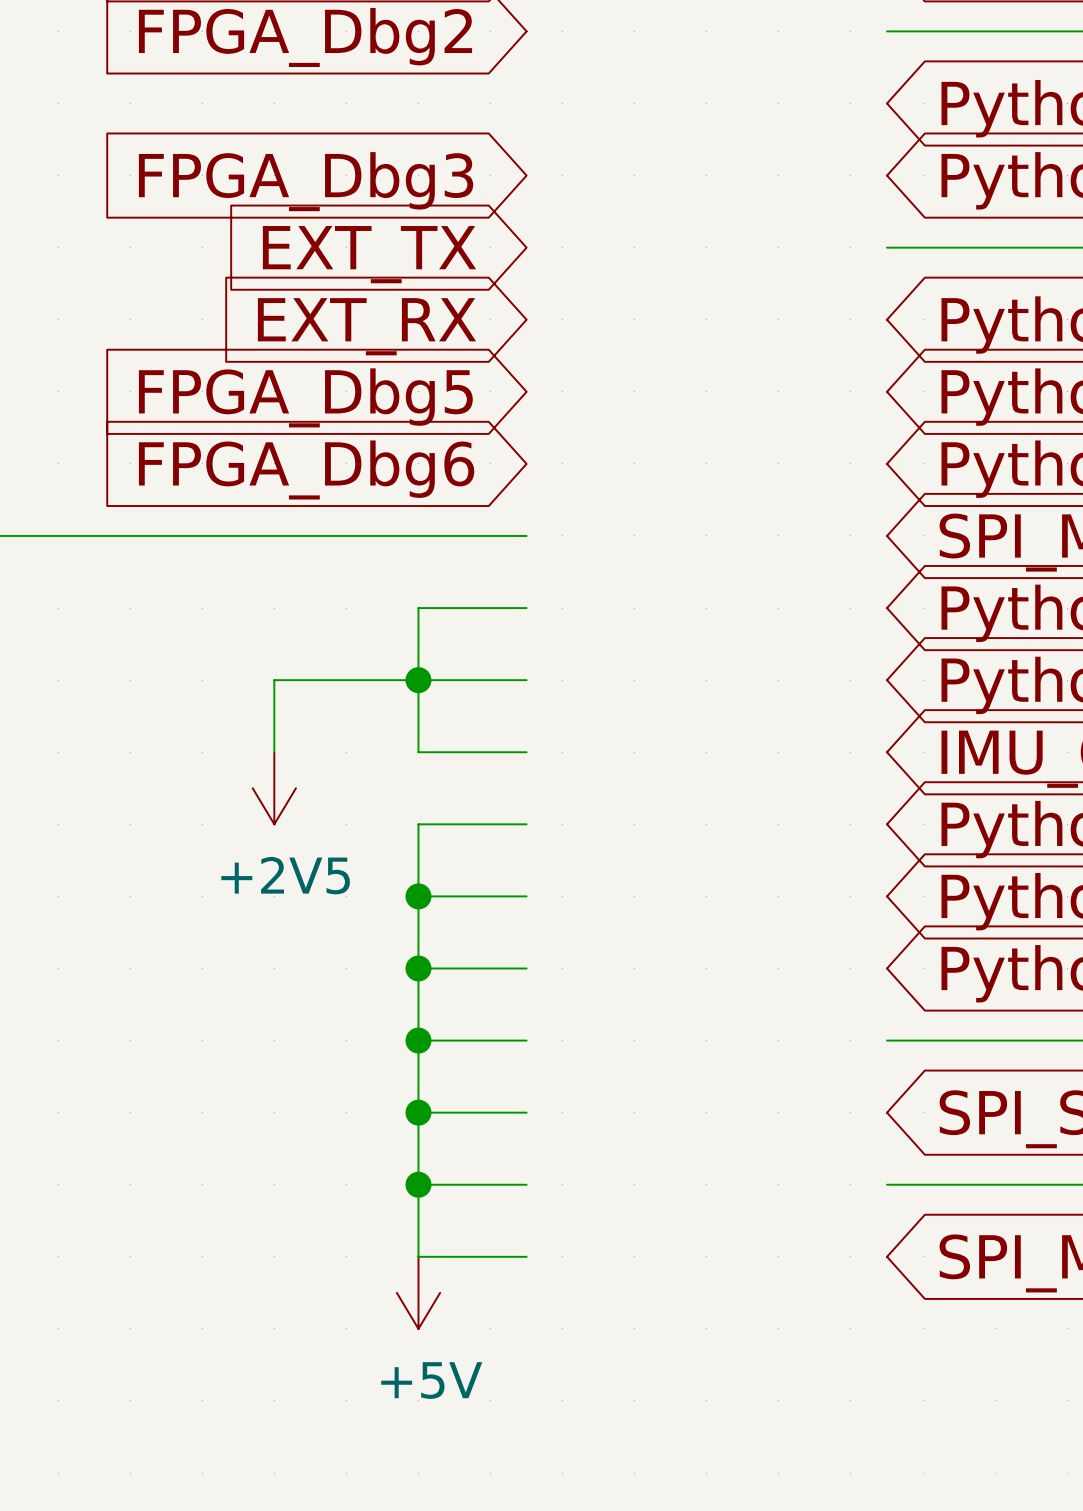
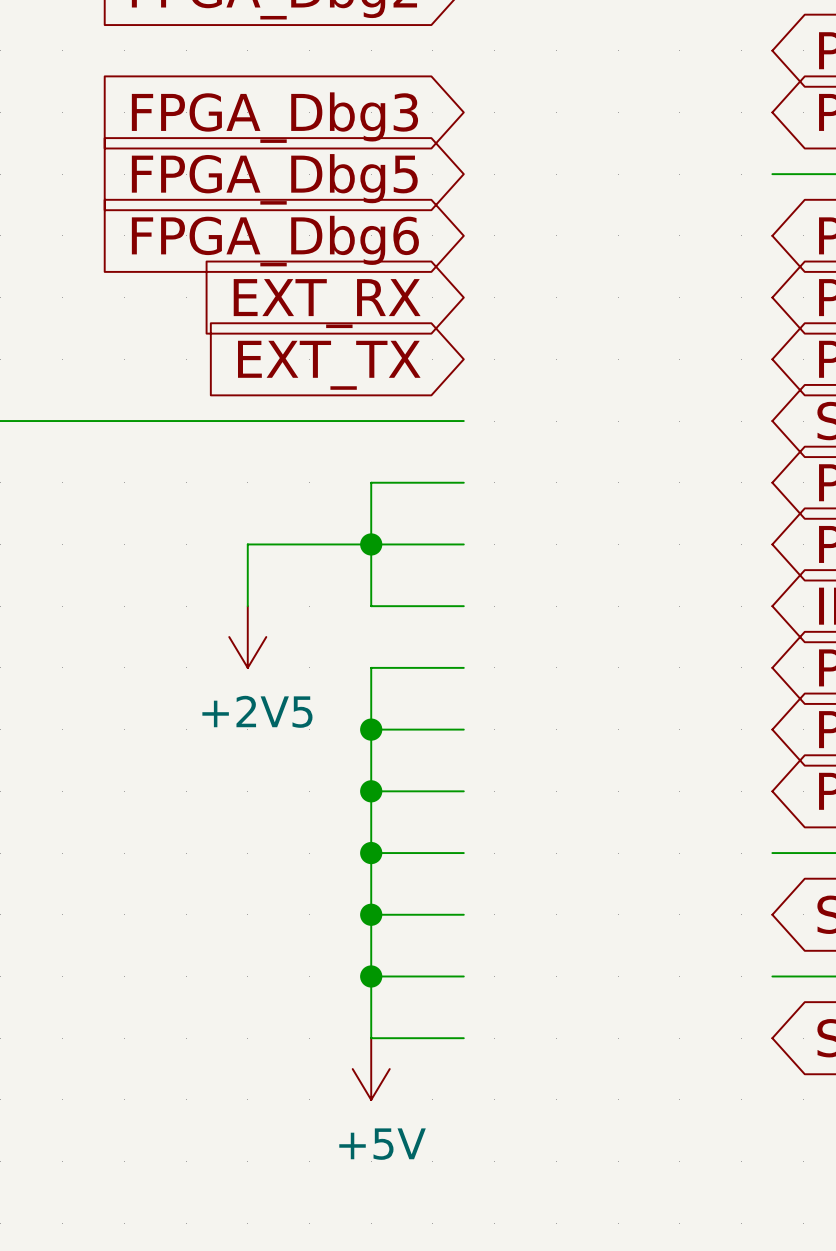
global label: EXT_TX (369, 254) -> FPGA_Dbg5 (274, 179)
global label: EXT_RX (367, 326) -> FPGA_Dbg6 (275, 241)
global label: FPGA_Dbg5 (305, 397) -> EXT_RX (327, 303)
global label: FPGA_Dbg6 (306, 469) -> EXT_TX (329, 365)

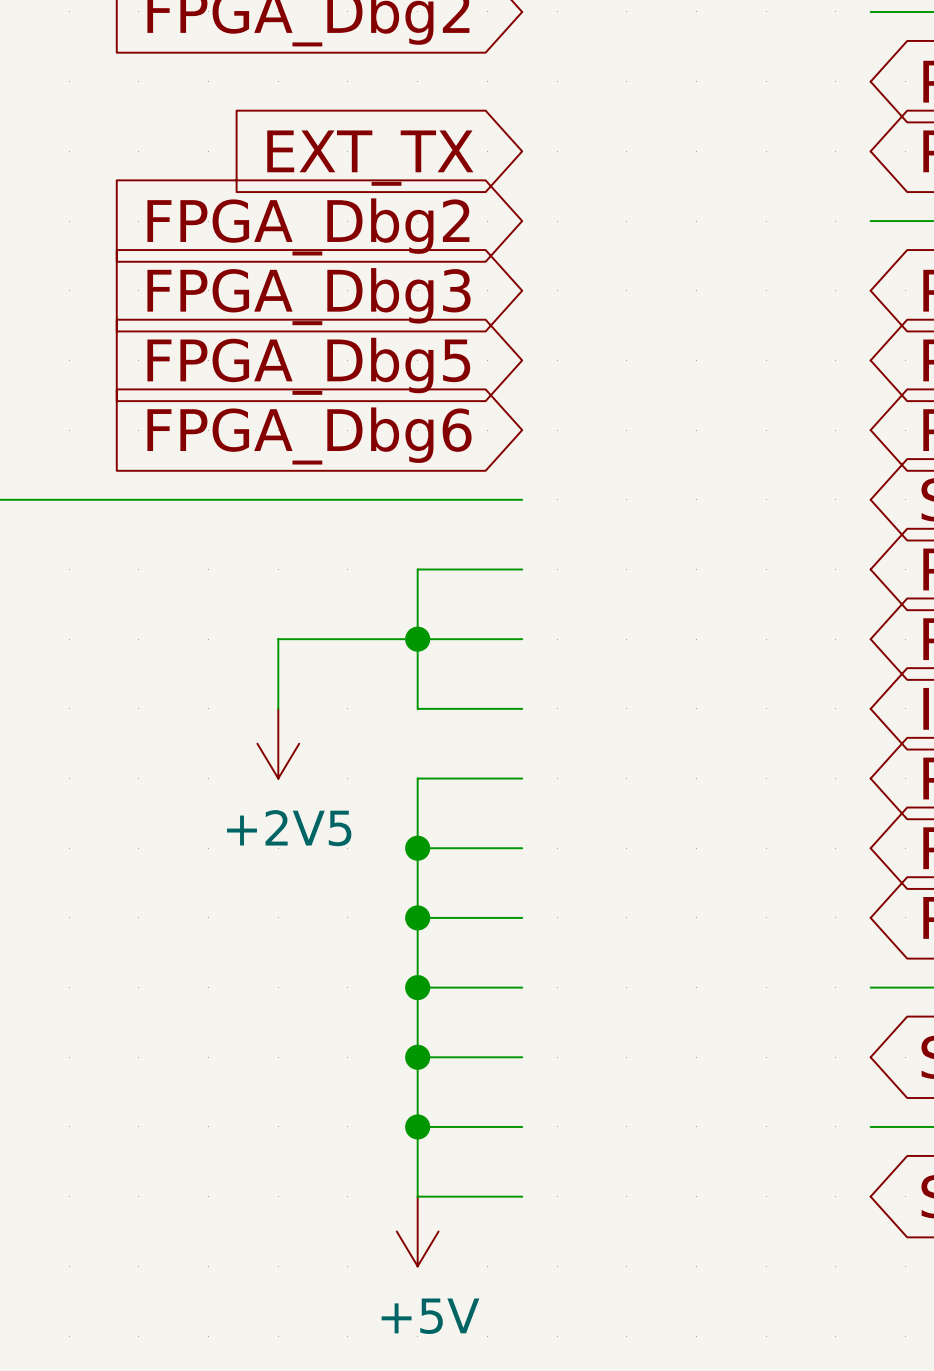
global label: FPGA_Dbg3 (274, 117) -> EXT_TX (370, 158)
global label: FPGA_Dbg5 (274, 179) -> FPGA_Dbg2 (308, 226)
global label: FPGA_Dbg6 (275, 241) -> FPGA_Dbg3 (309, 296)
global label: EXT_RX (327, 303) -> FPGA_Dbg5 (308, 366)
global label: EXT_TX (329, 365) -> FPGA_Dbg6 (309, 435)

